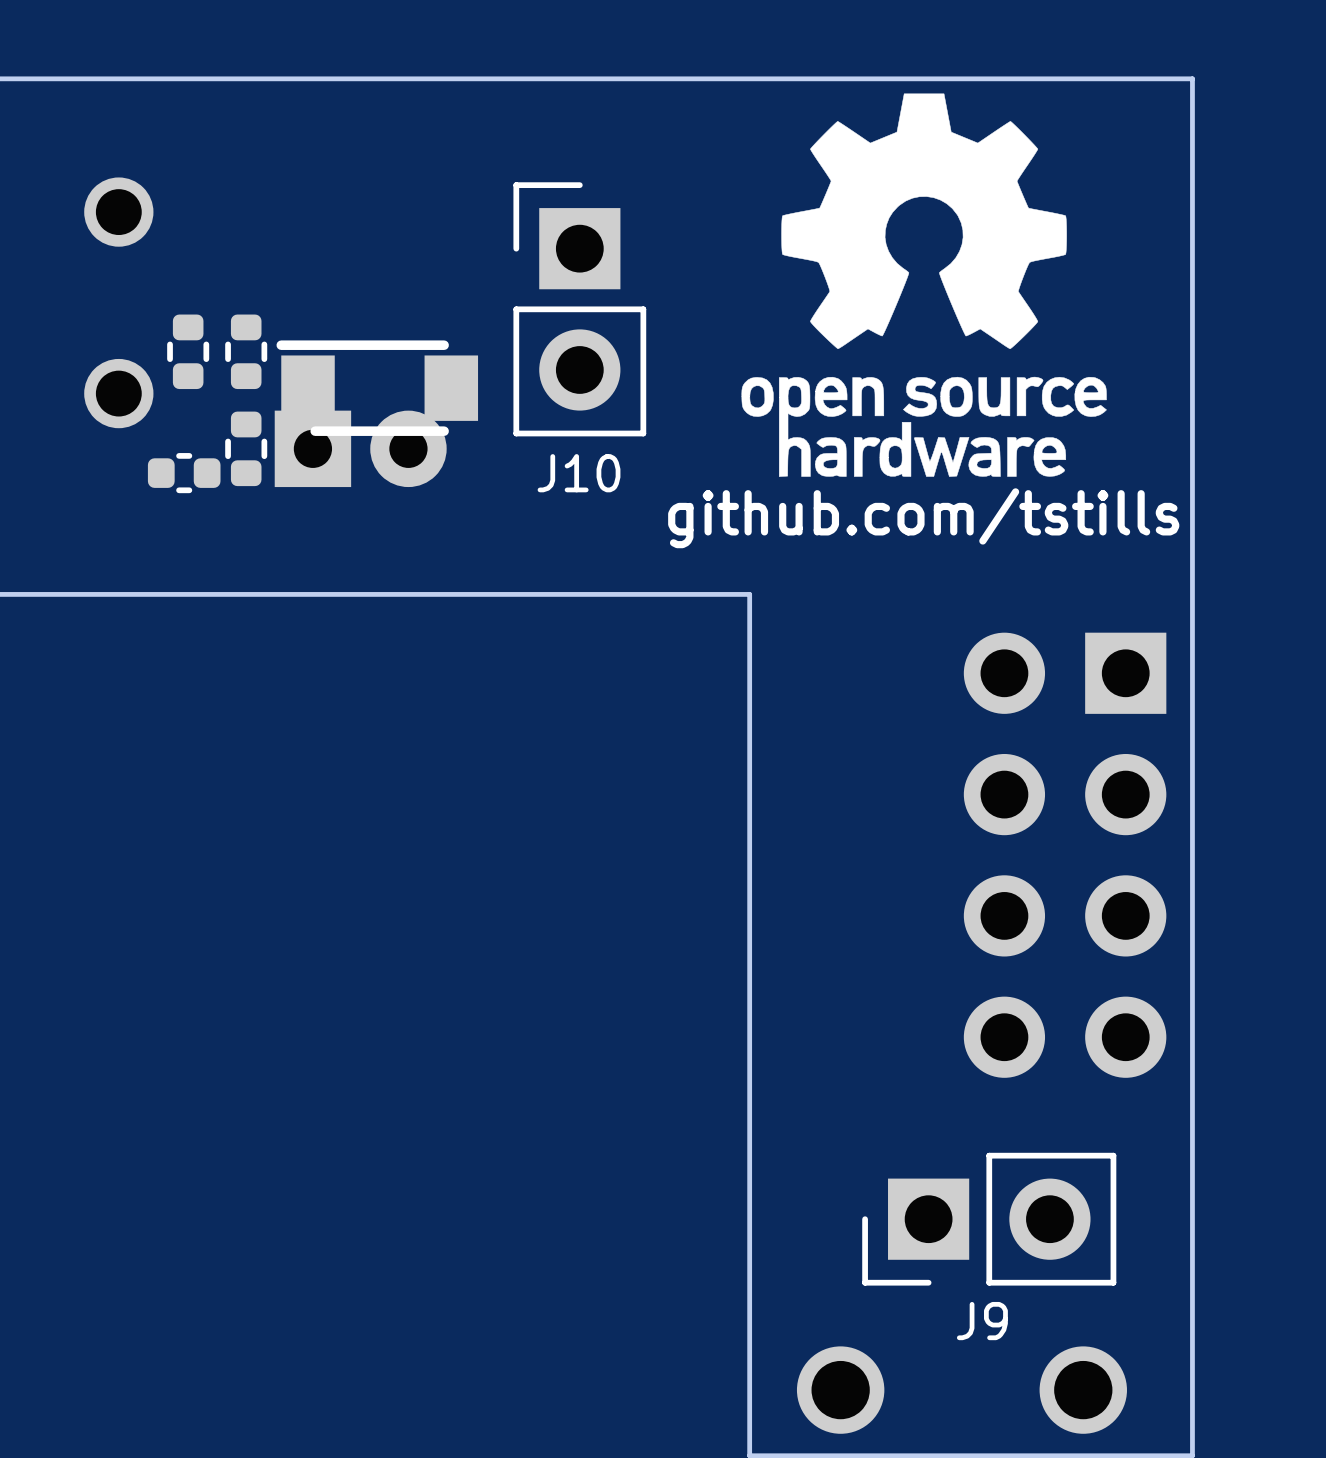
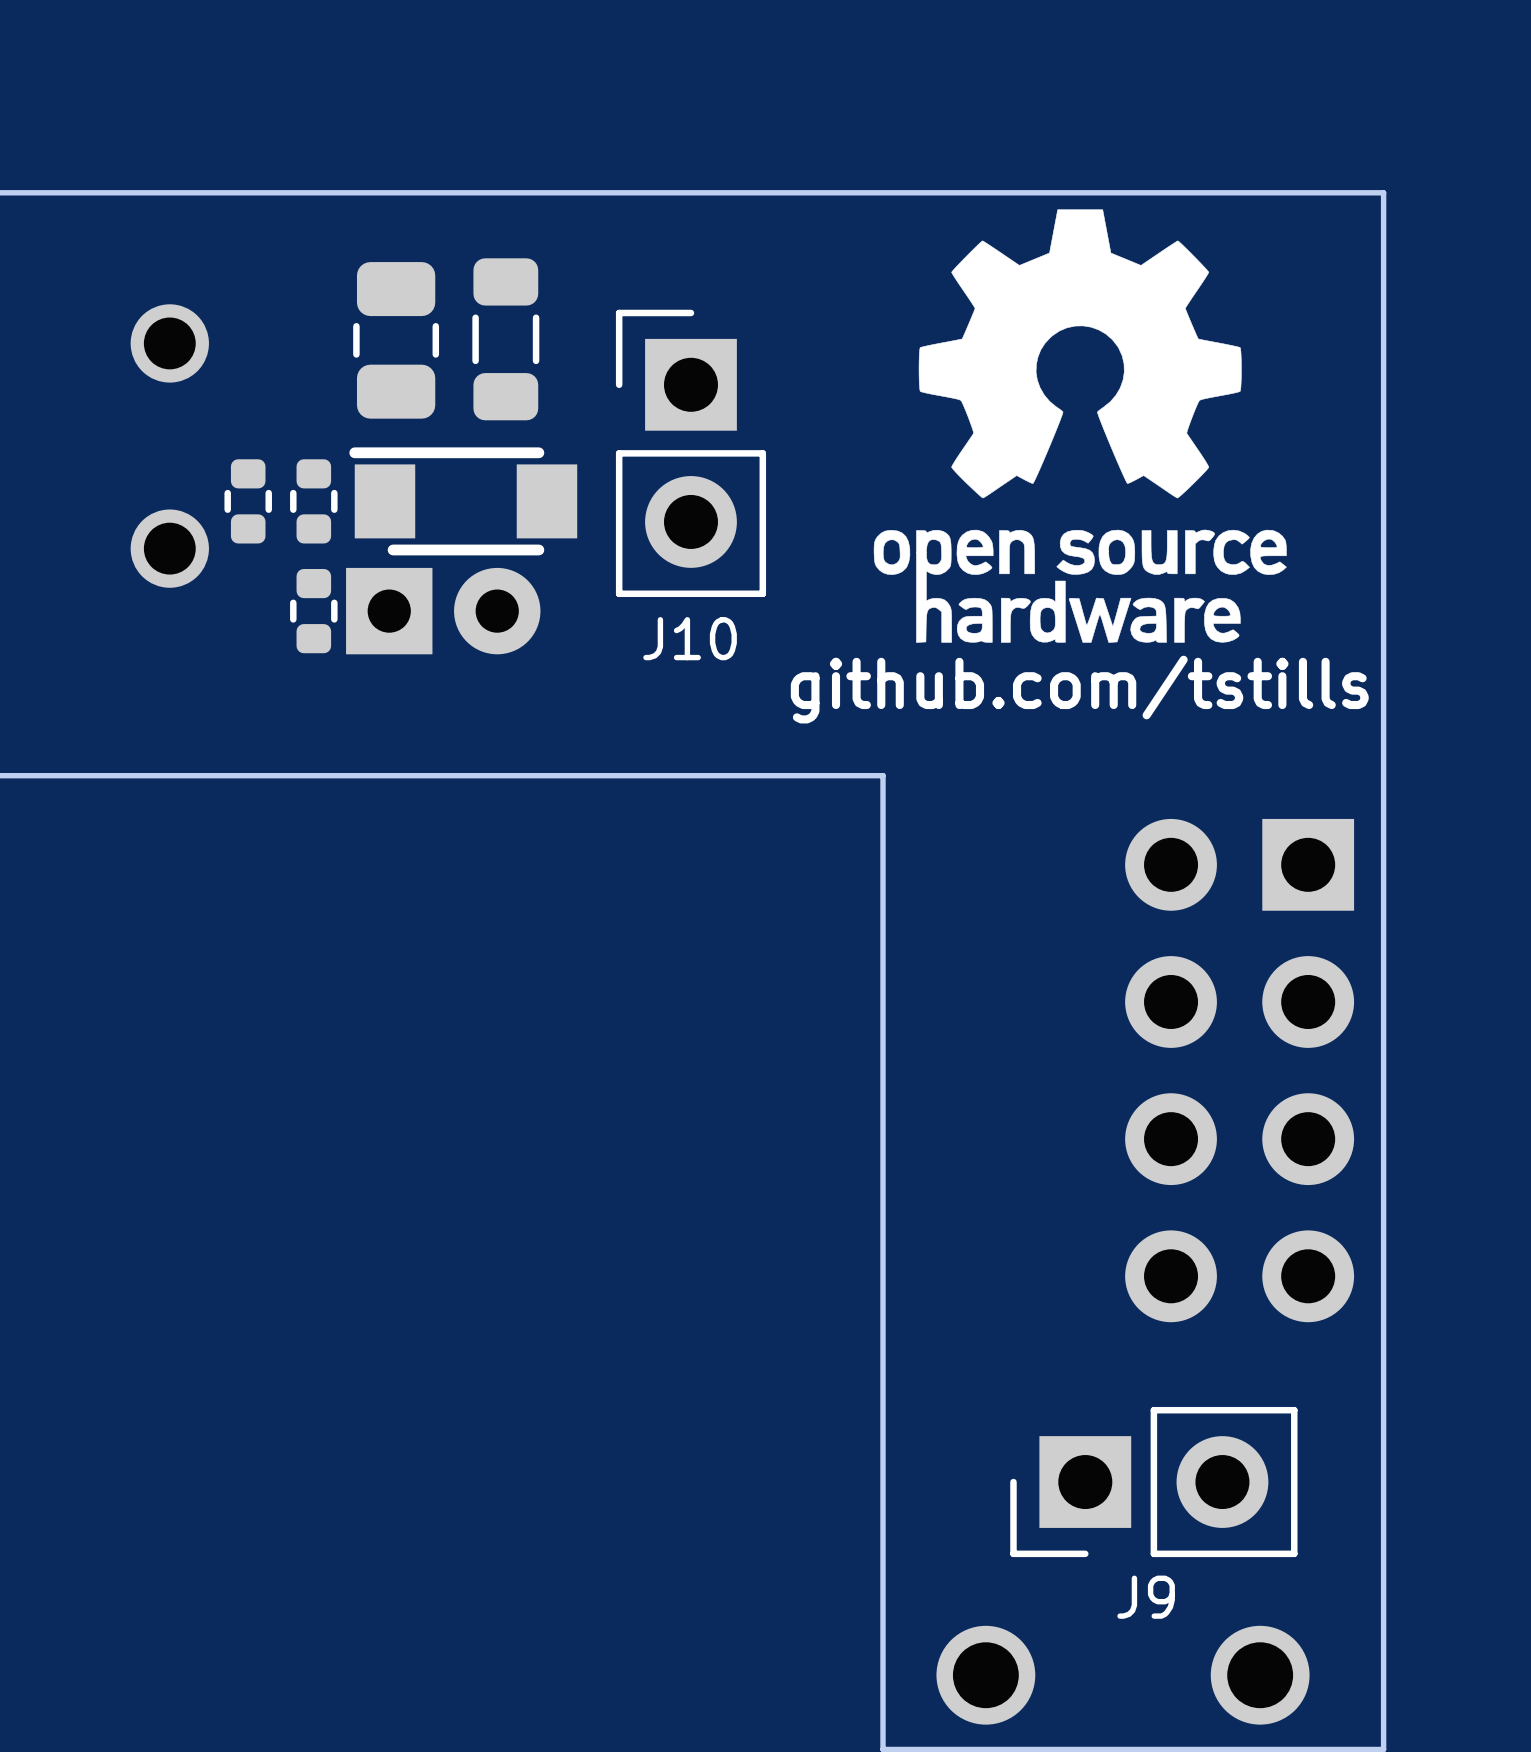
part: none -> (505, 339)
part: none -> (396, 340)
part position: (377, 388) -> (463, 501)
part: (184, 473) -> none

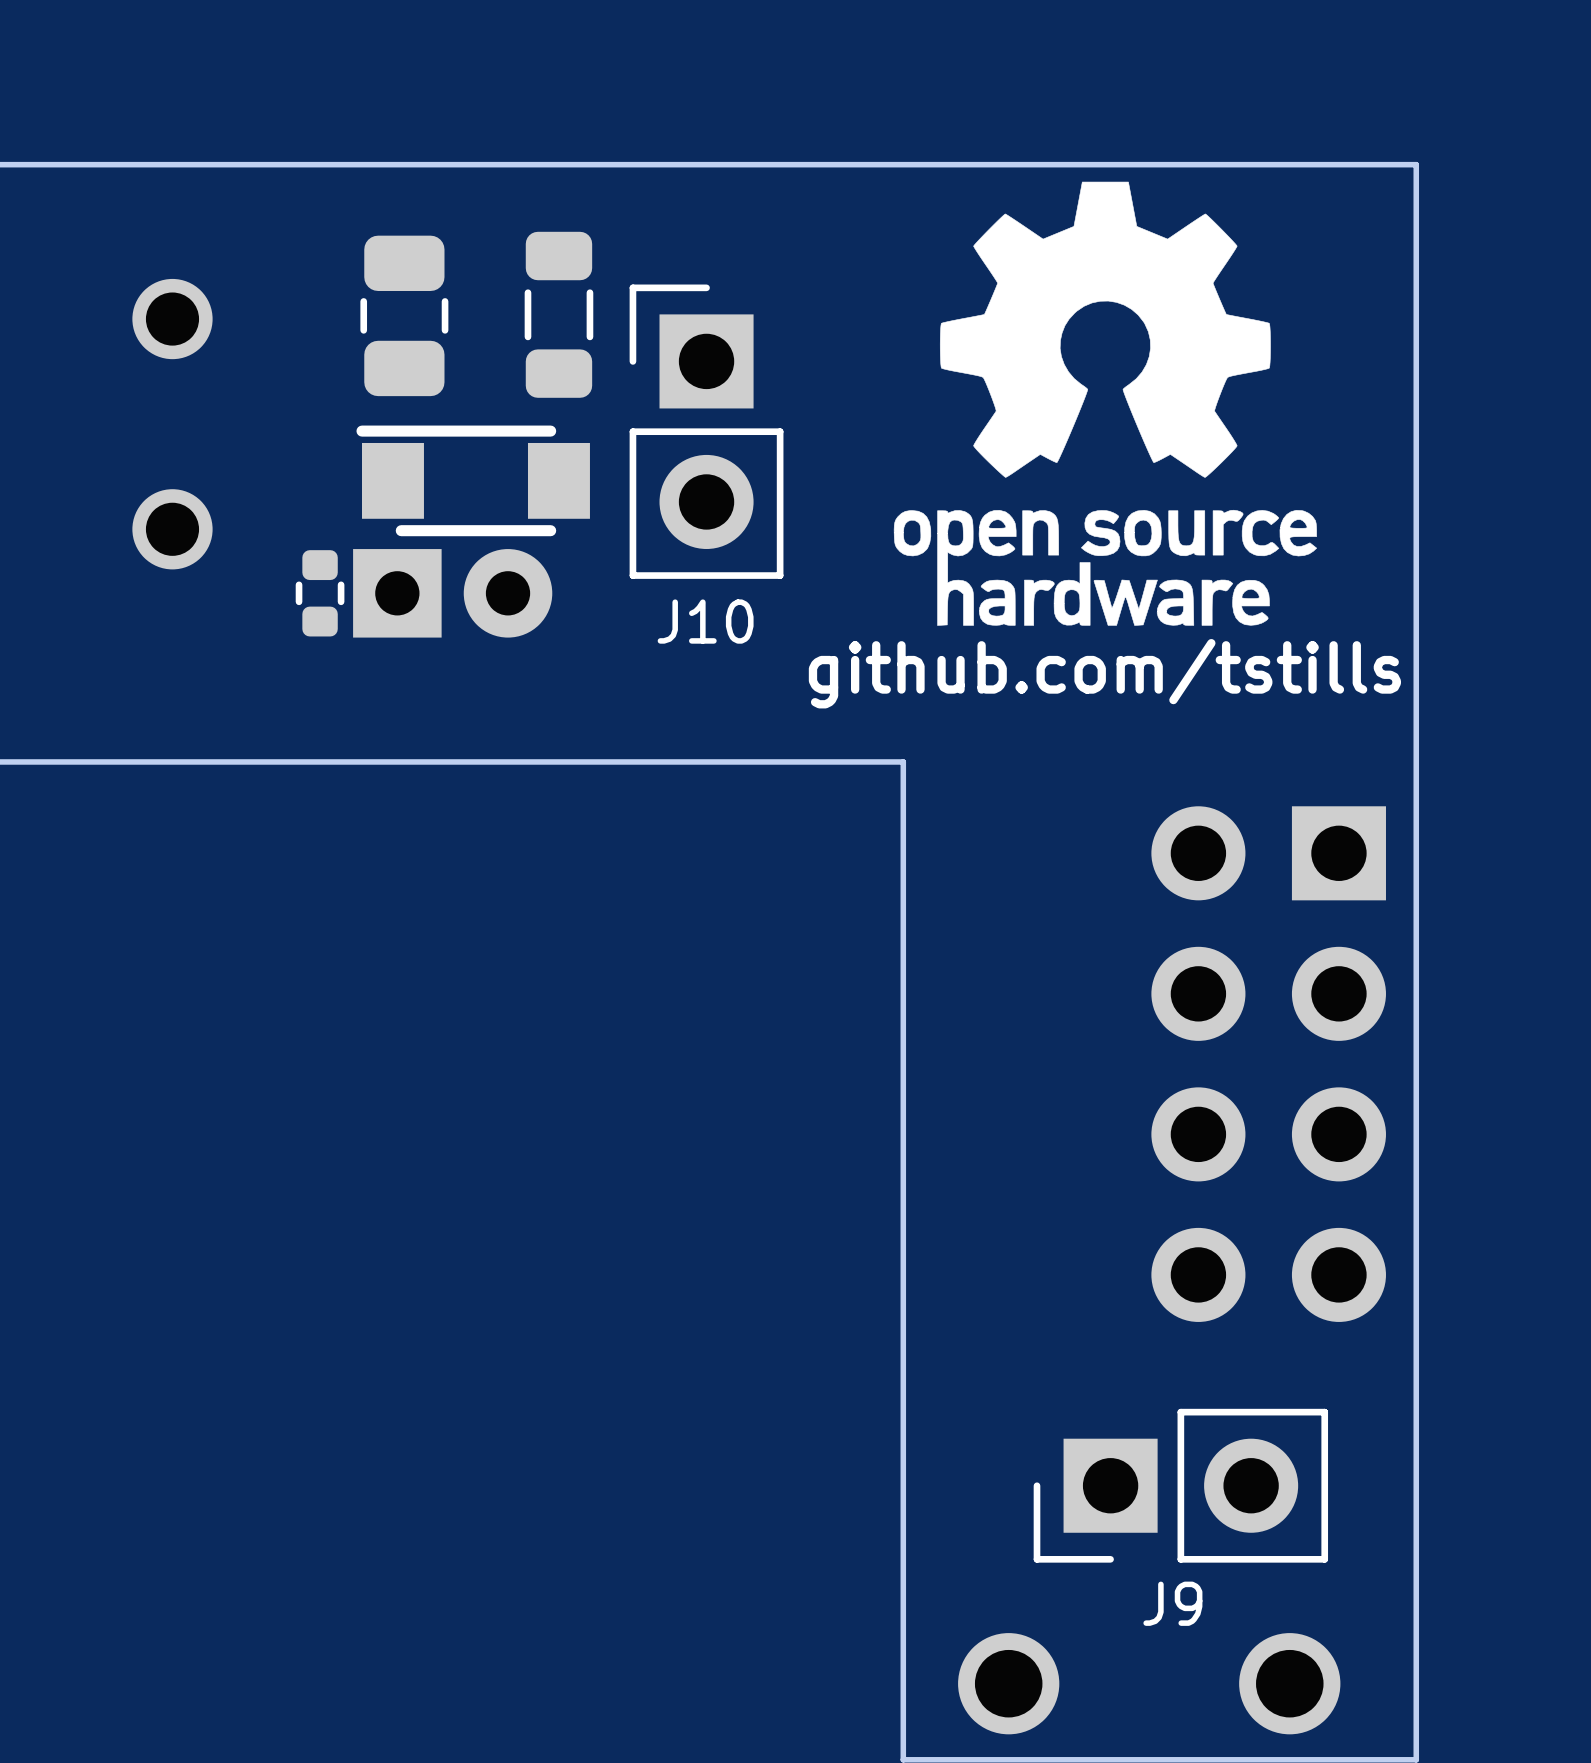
part position: (505, 339) -> (558, 314)
part: (248, 501) -> none
part: (313, 501) -> none

